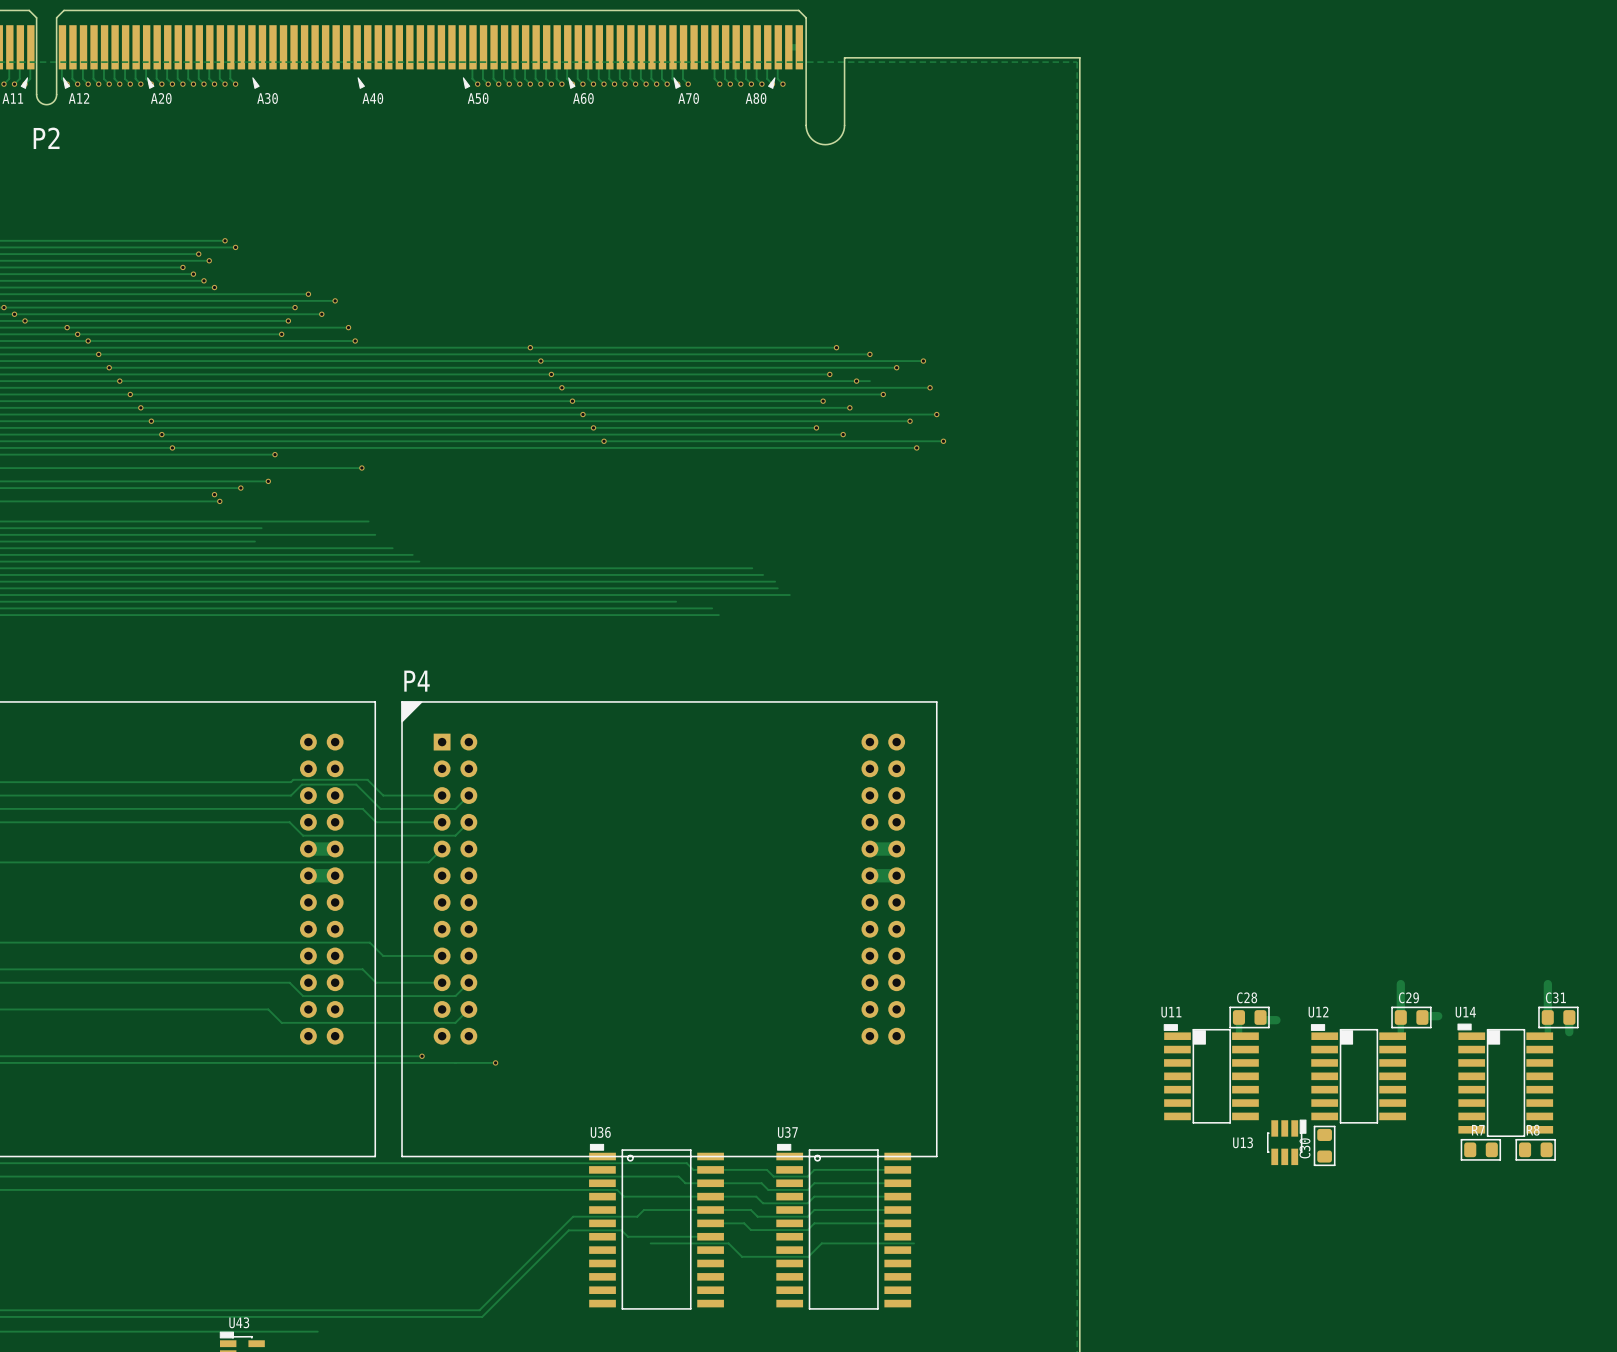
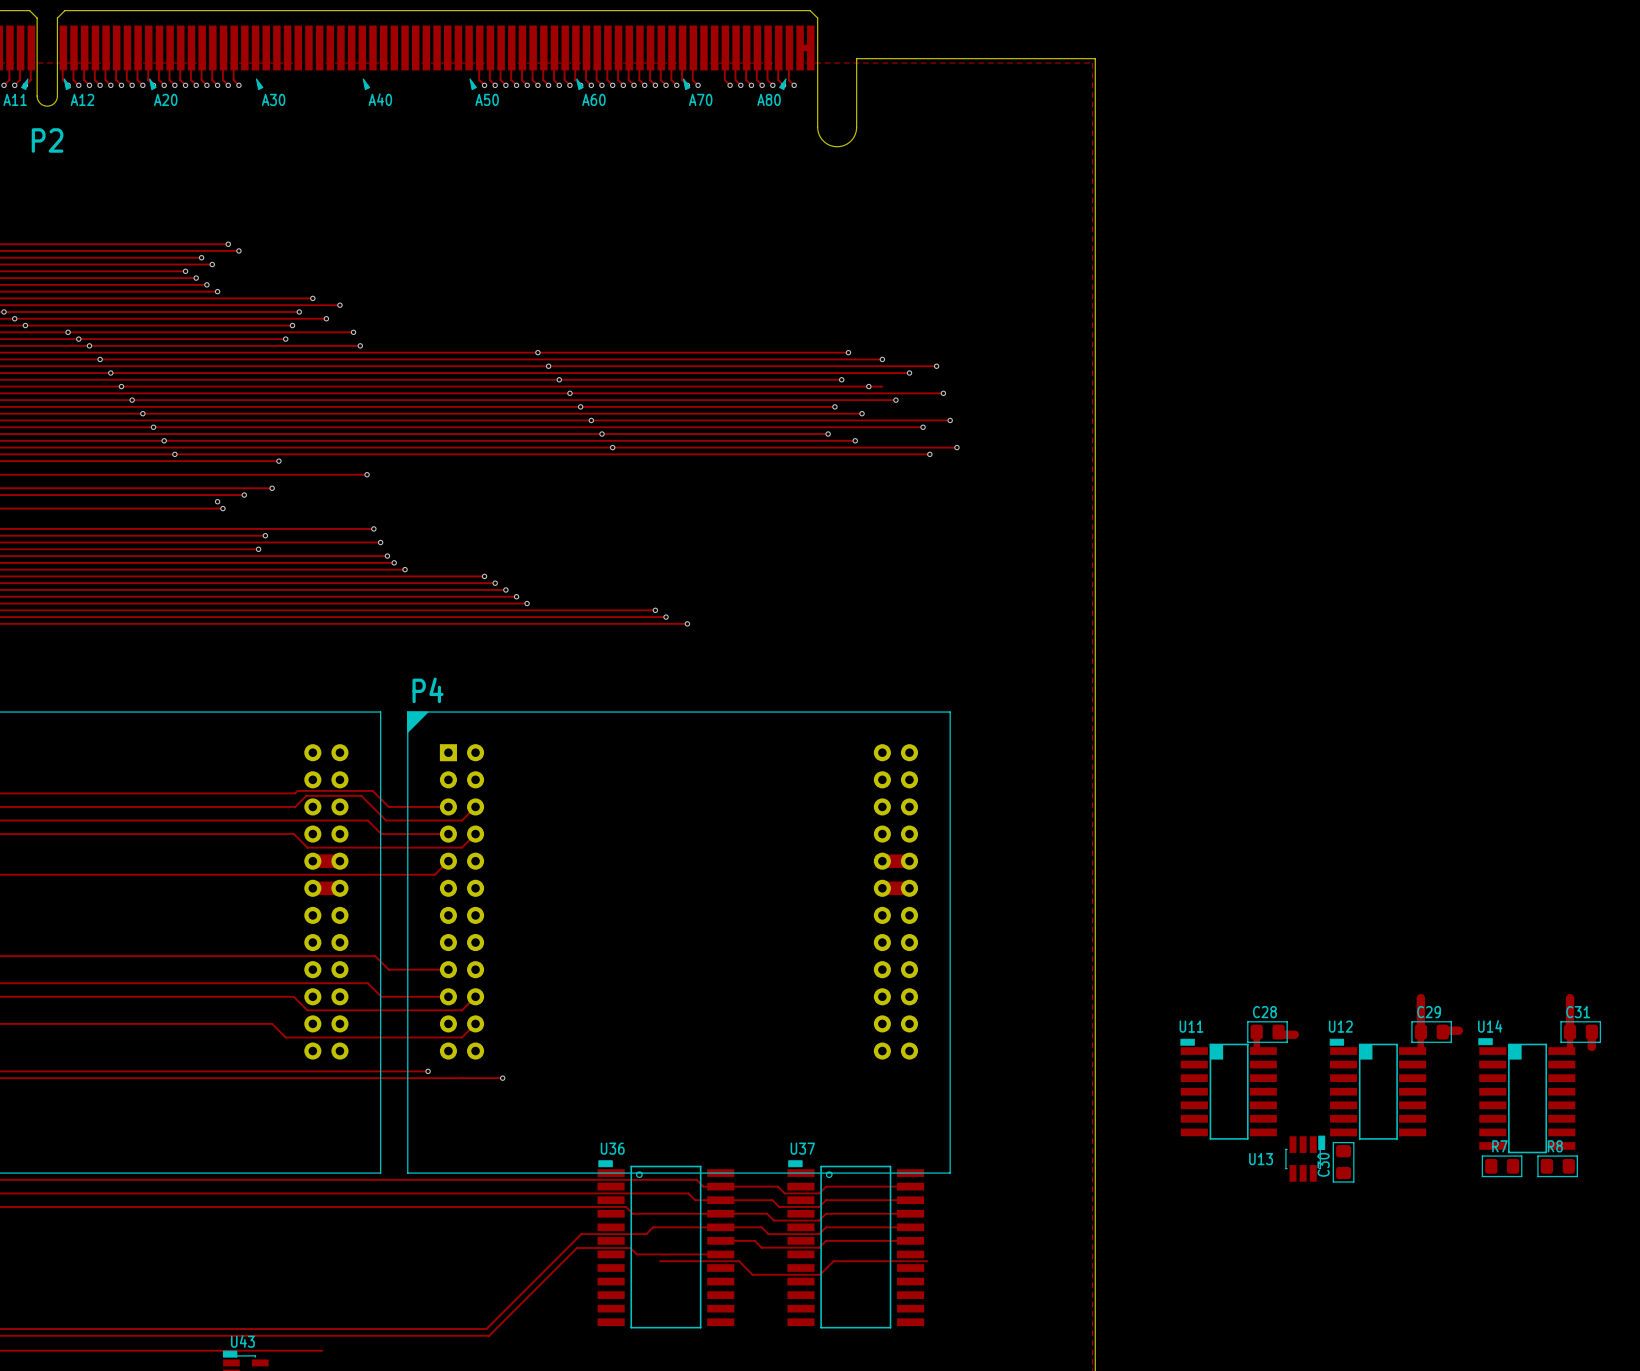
via: none -> (373, 528)
via: none -> (265, 535)
via: none -> (380, 542)
via: none -> (258, 549)
track: (381, 548) (392, 548) -> none
via: none -> (387, 556)
track: (388, 554) (412, 554) -> none
via: none -> (394, 562)
track: (399, 561) (419, 561) -> none
via: none -> (405, 569)
track: (477, 568) (752, 568) -> none
via: none -> (484, 576)
track: (488, 574) (763, 574) -> none
via: none -> (495, 583)
track: (498, 581) (775, 581) -> none
via: none -> (505, 589)
track: (509, 588) (777, 588) -> none
via: none -> (516, 596)
track: (519, 595) (789, 595) -> none
via: none -> (527, 603)
track: (646, 601) (676, 601) -> none
via: none -> (655, 610)
track: (656, 608) (712, 608) -> none
via: none -> (666, 617)
track: (677, 615) (718, 615) -> none
via: none -> (687, 623)

